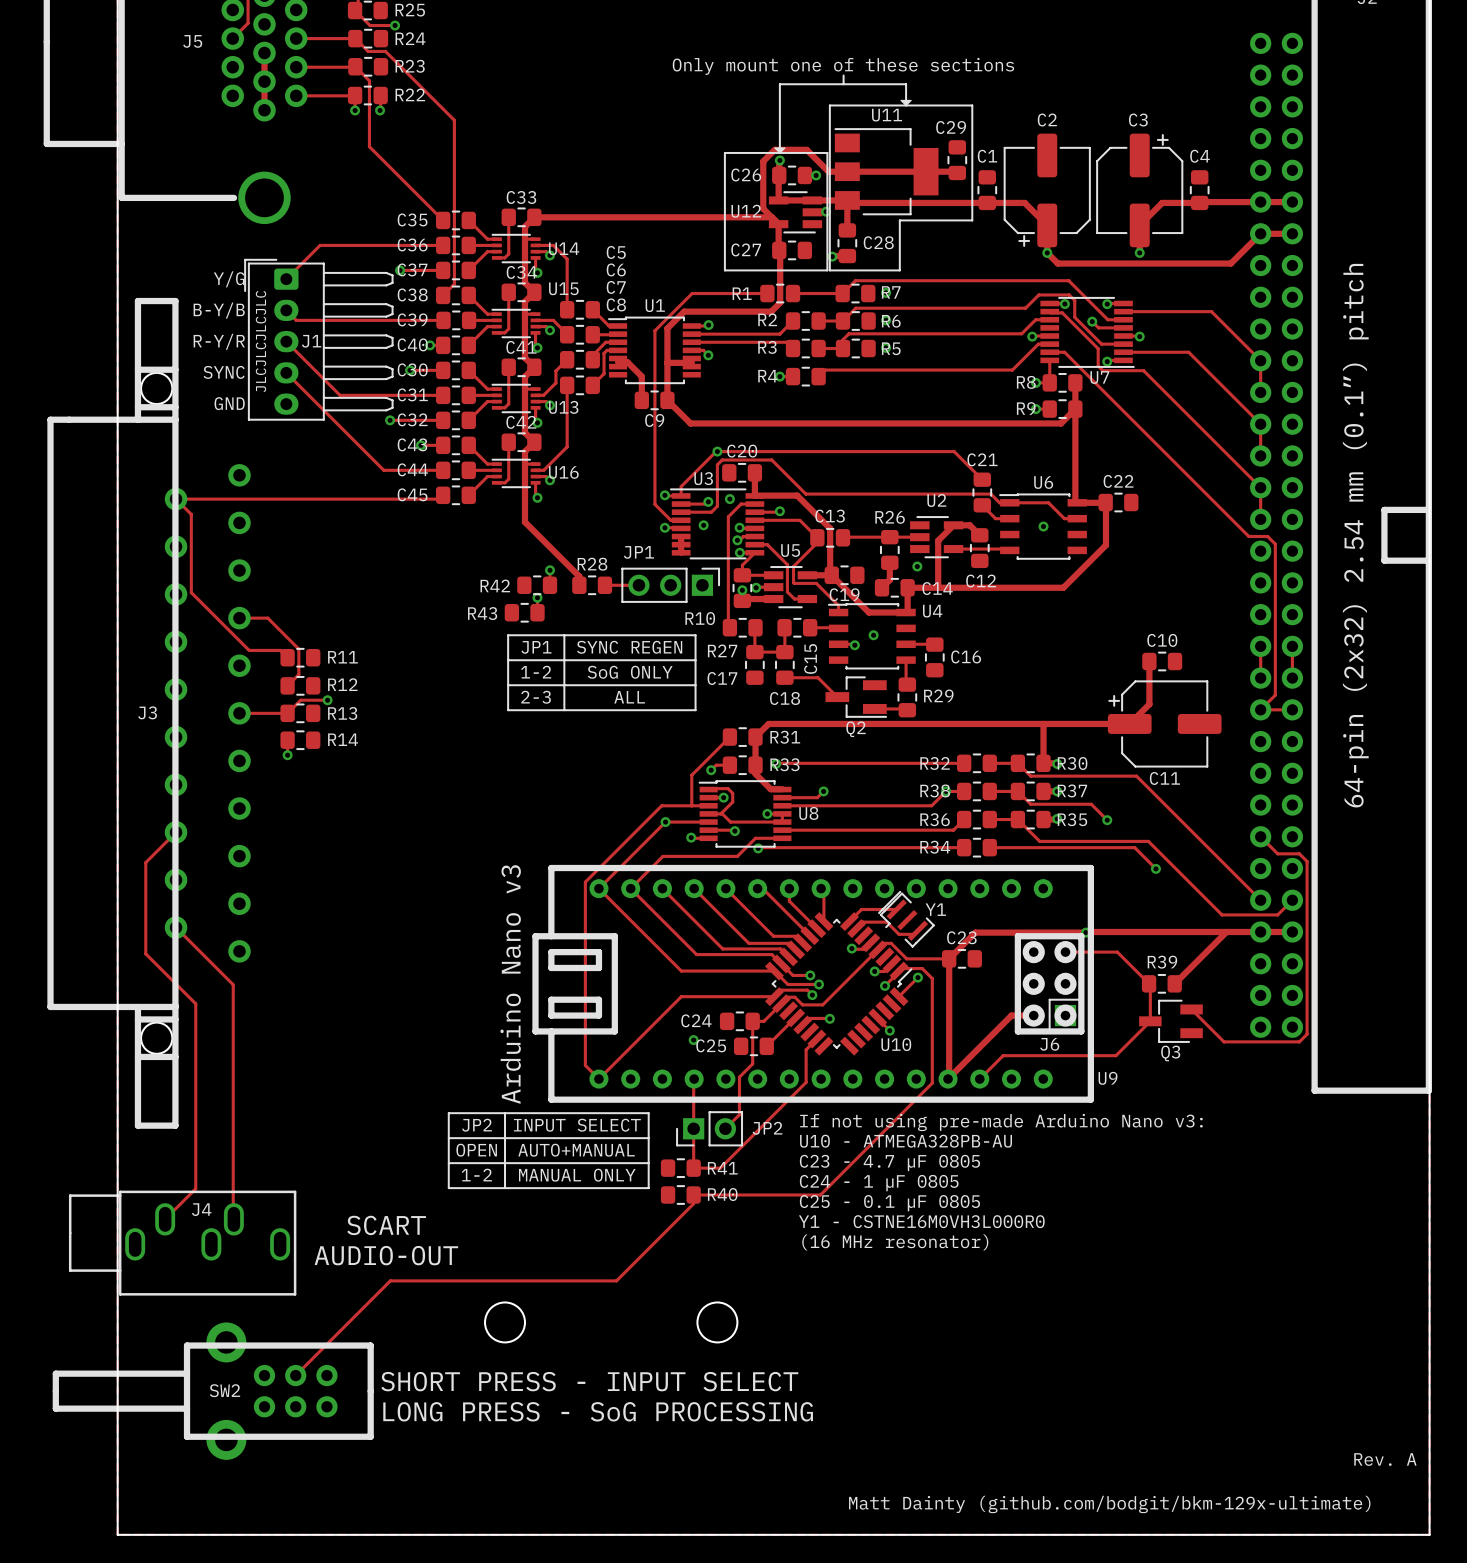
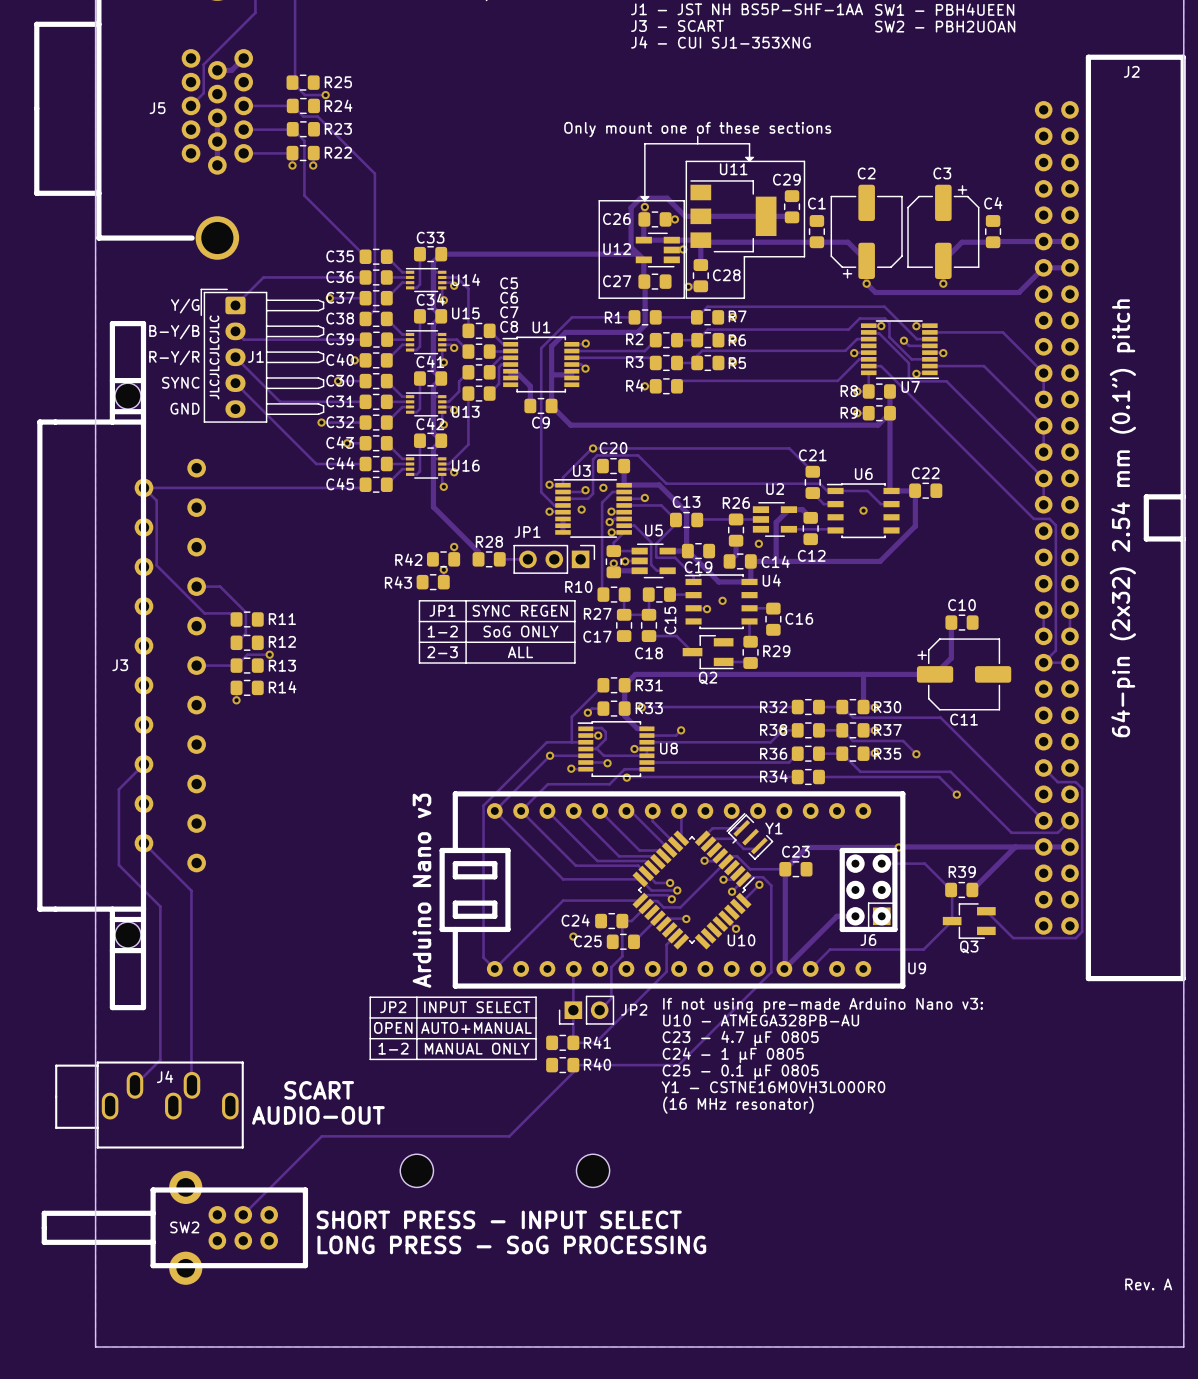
text: Matt Dainty (github.com/bodgit/bkm-129x-ultimate) (1109, 1504) -> none

